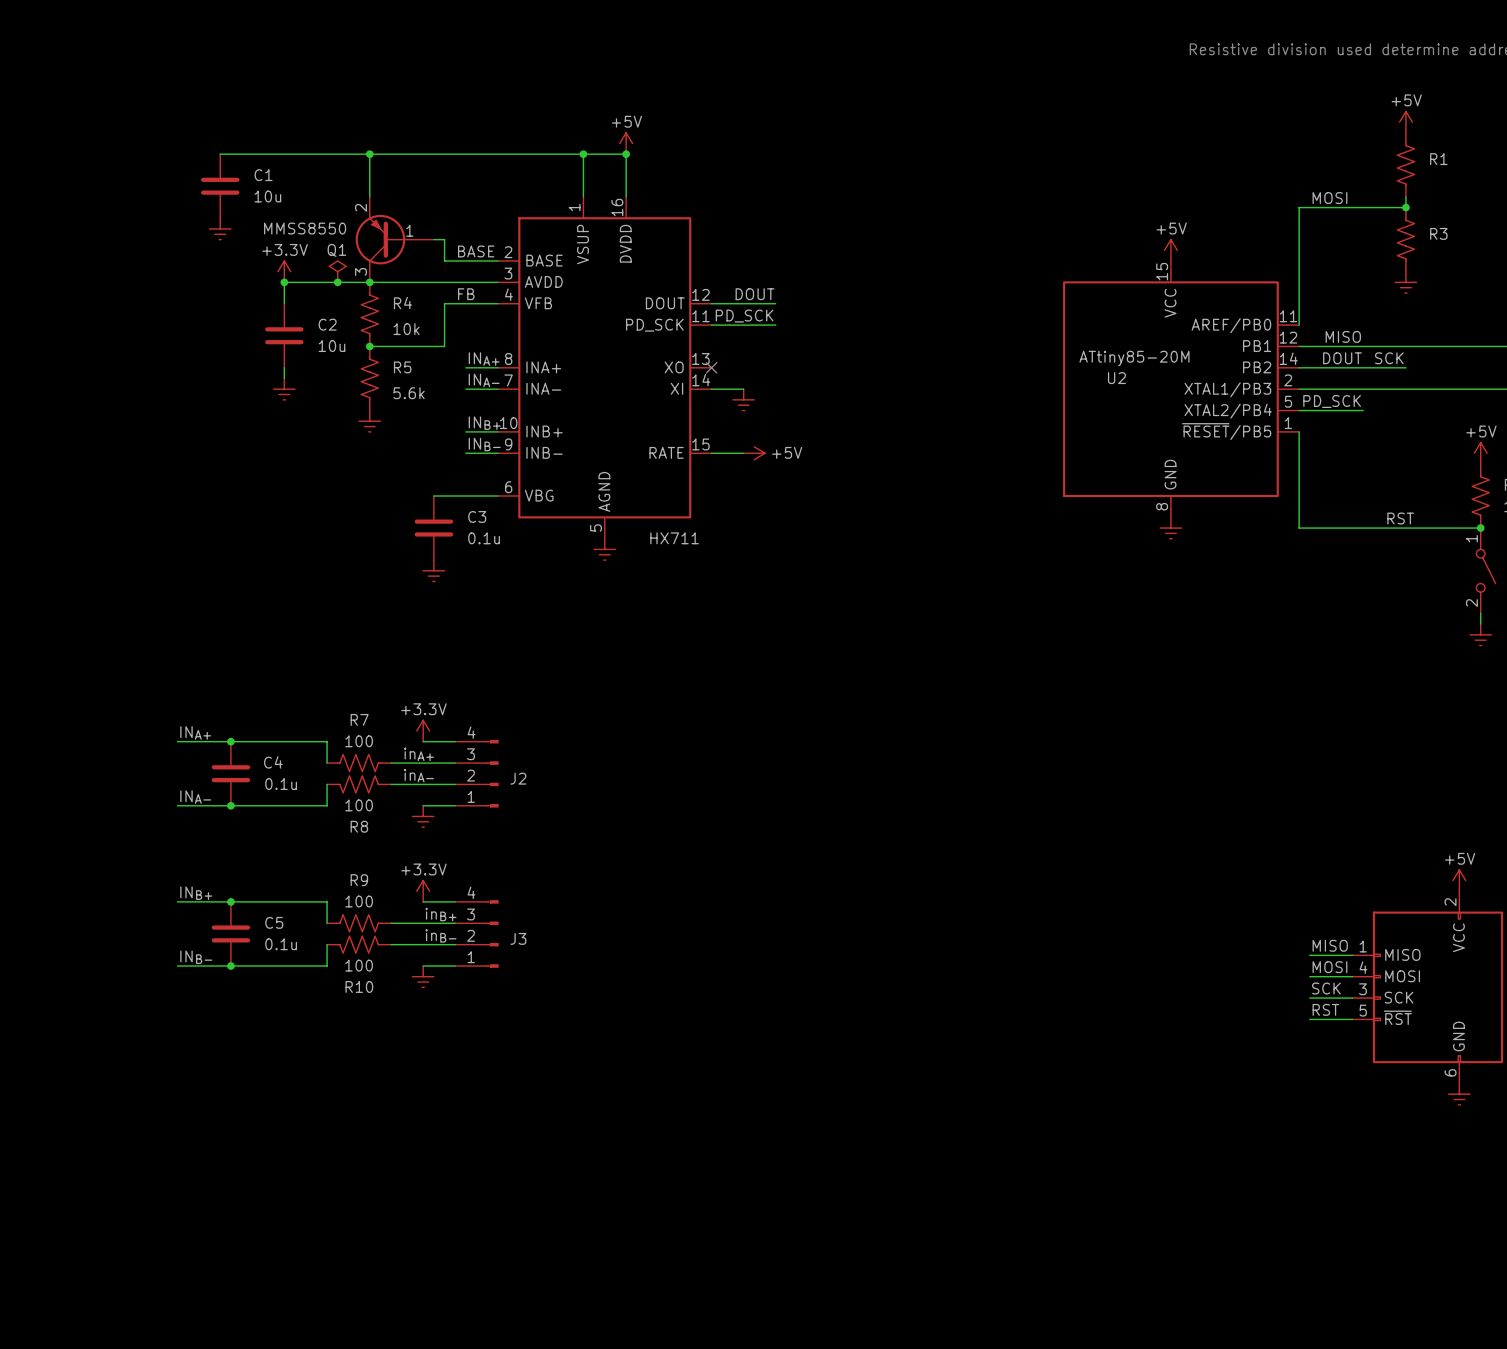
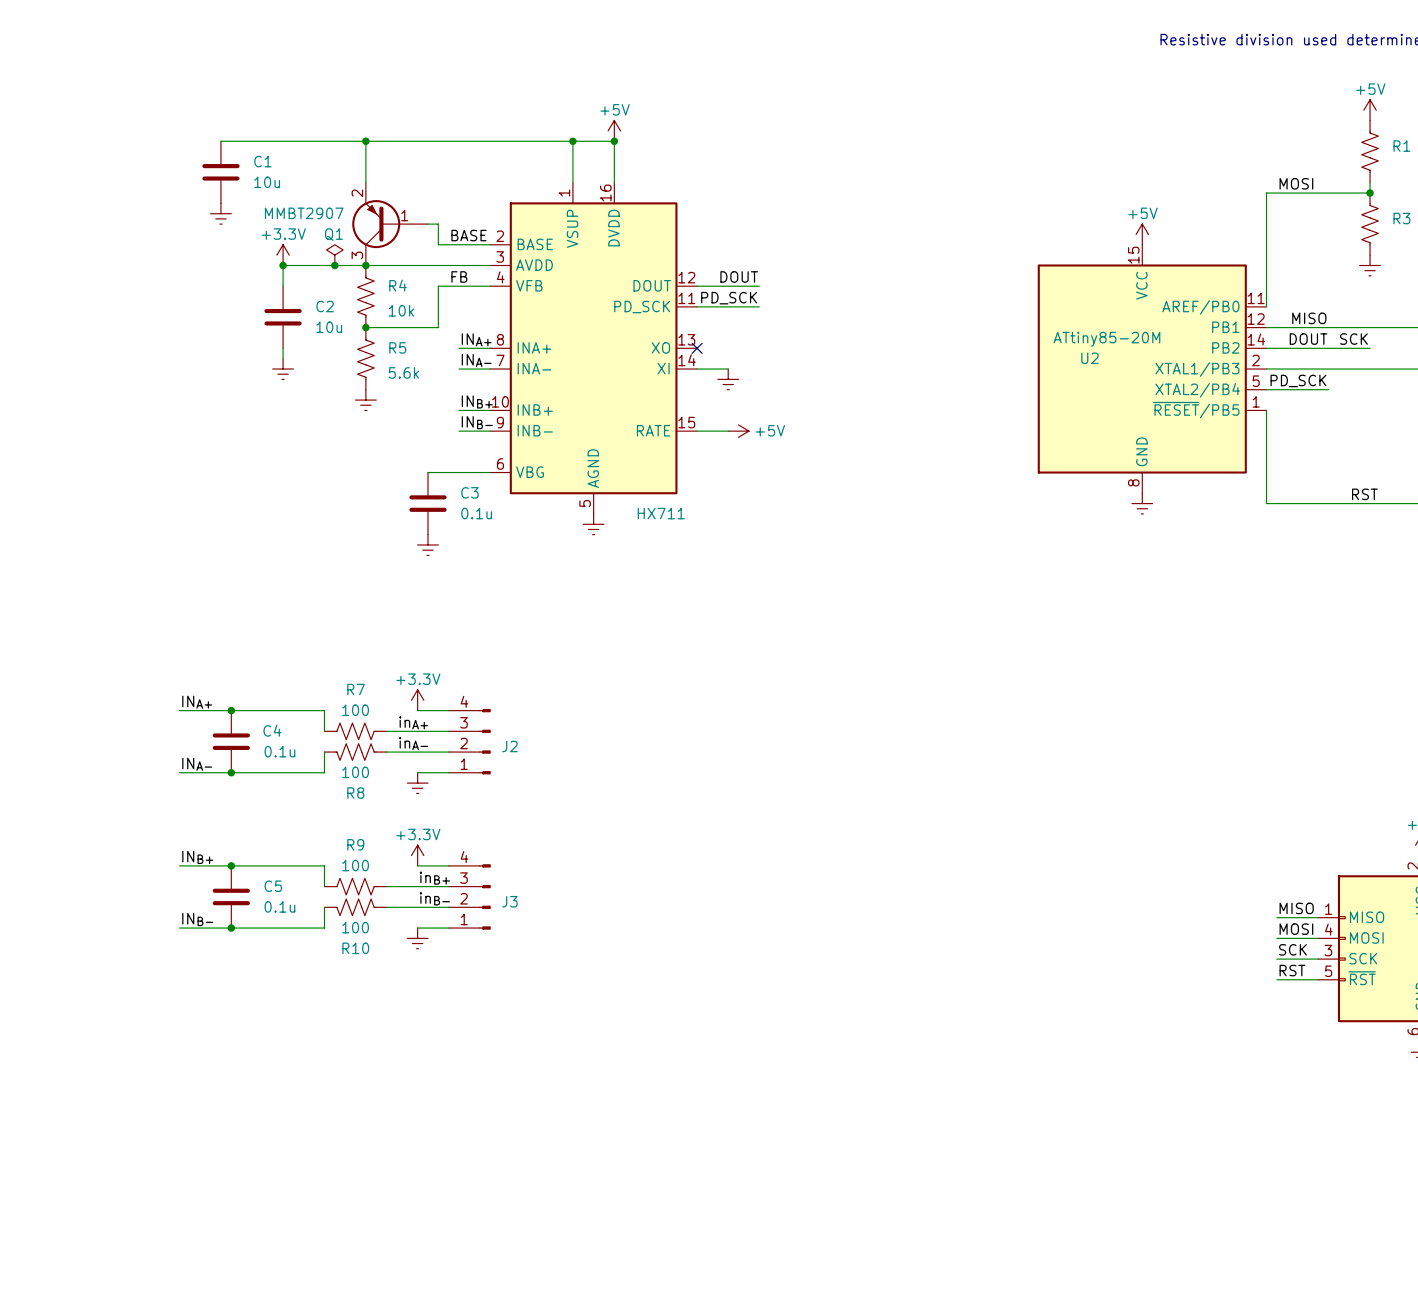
Q1 value: MMSS8550 (305, 228) -> MMBT2907 (304, 213)

